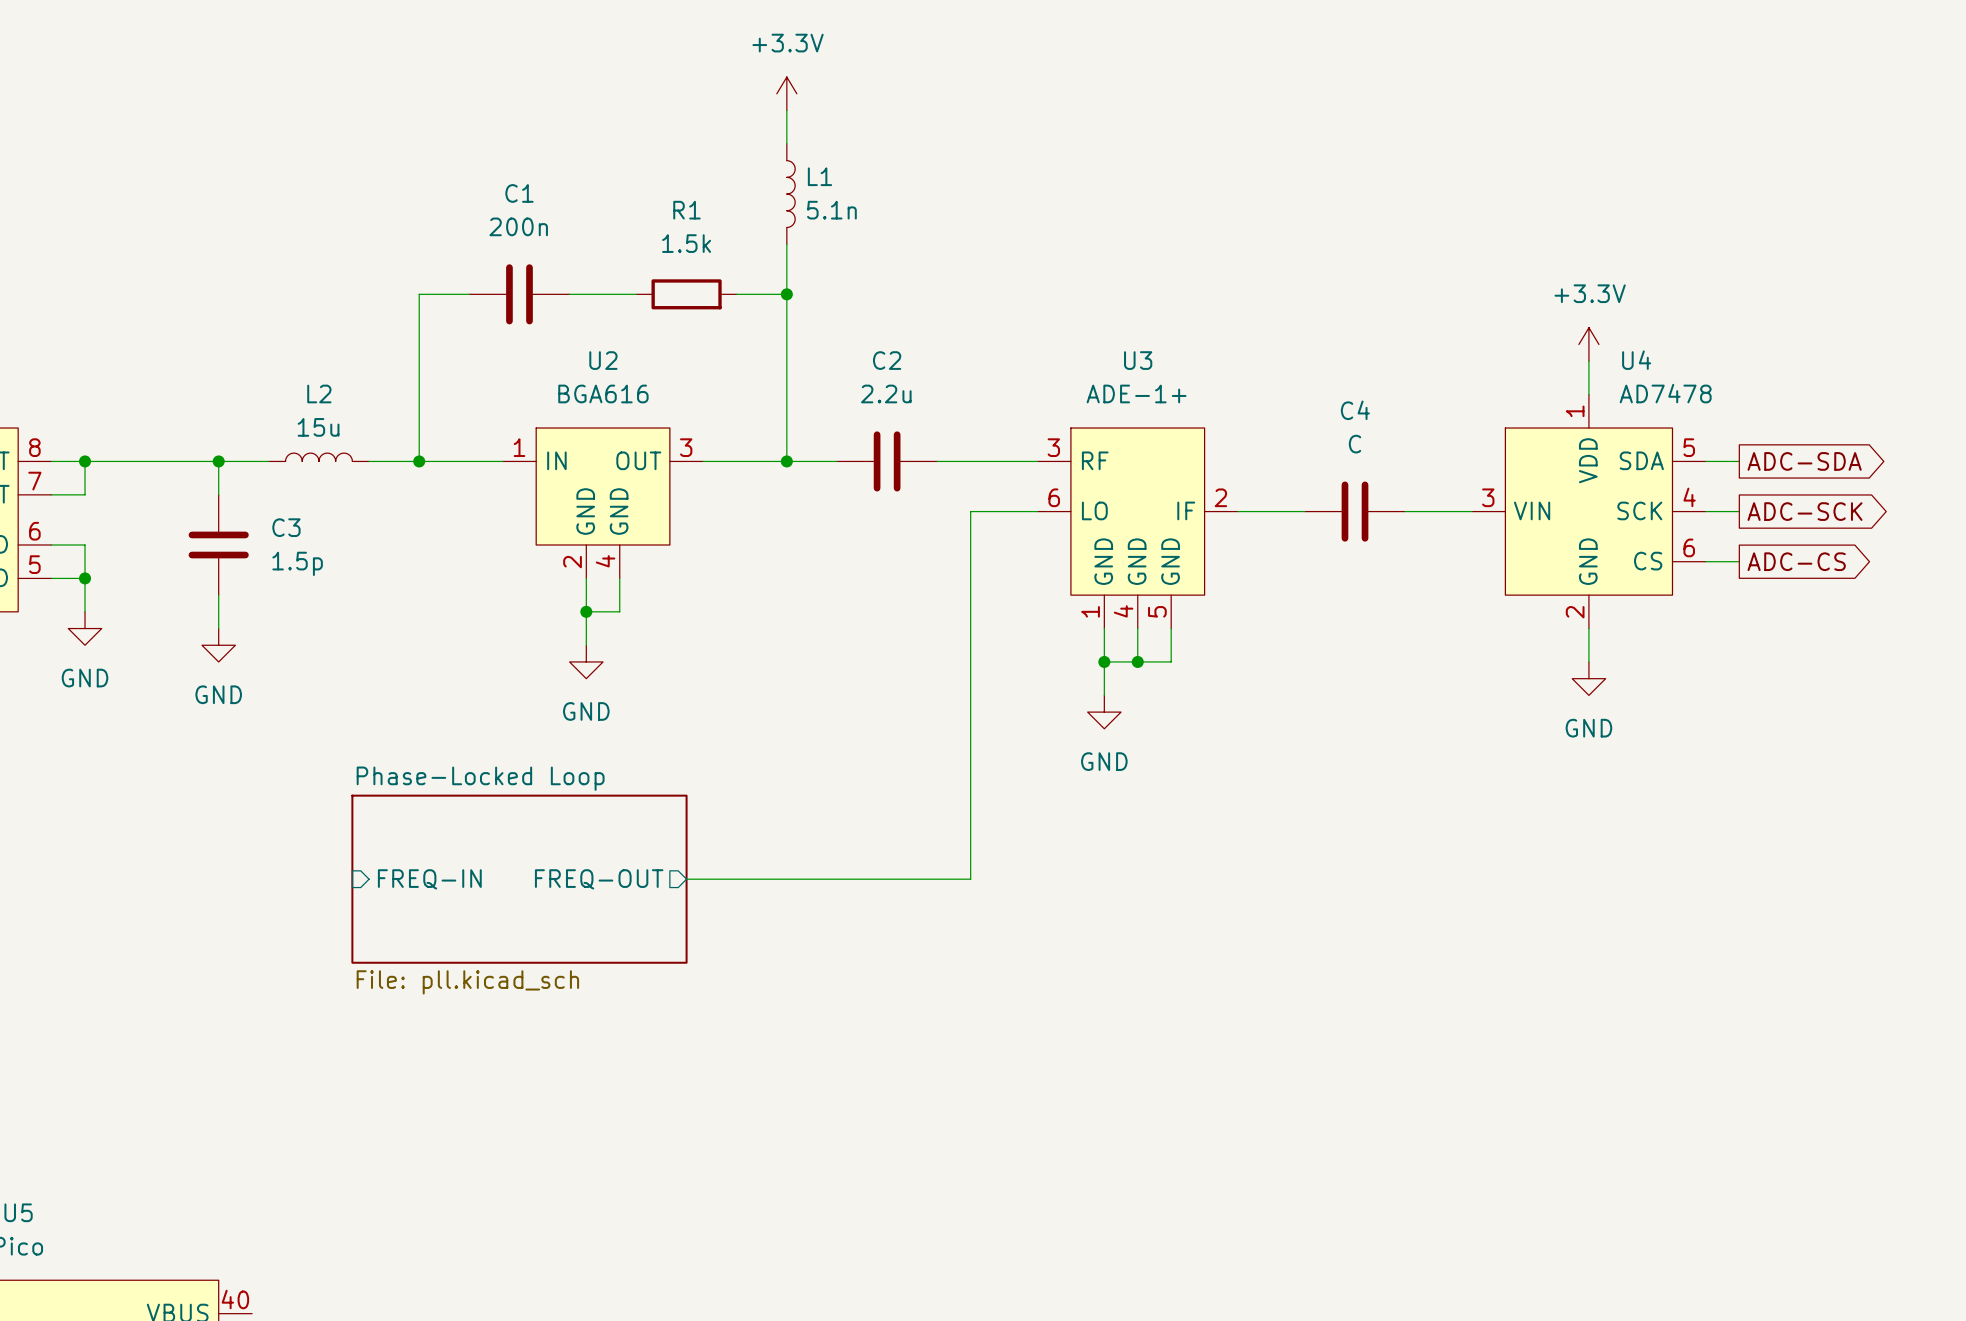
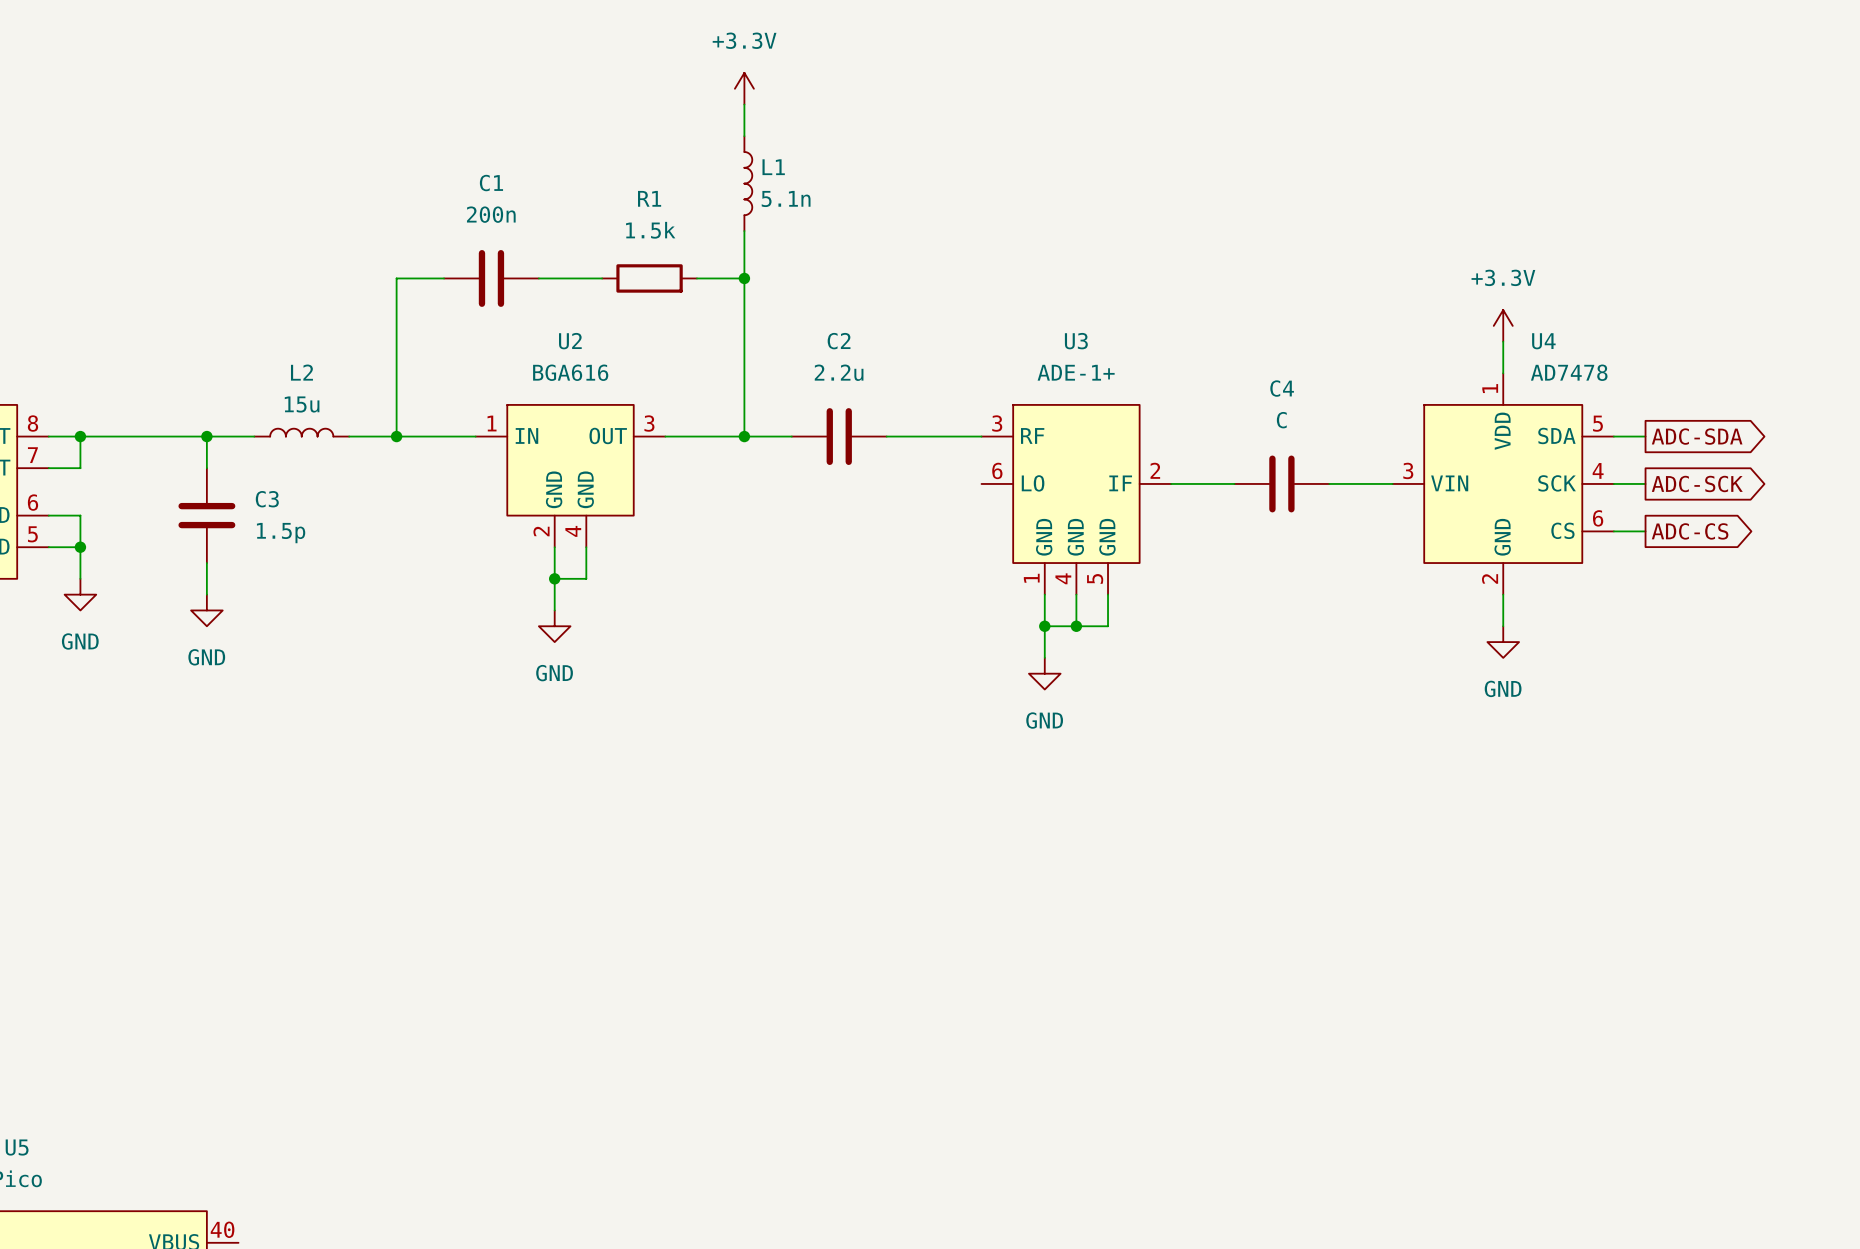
wire: (1037, 511) (970, 511) (970, 879) (686, 879) -> none
sheet pin: FREQ-IN (429, 879) -> none
sheet Phase-Locked Loop: File: pll.kicad_sch (519, 879) -> none
sheet pin: FREQ-OUT (599, 879) -> none

